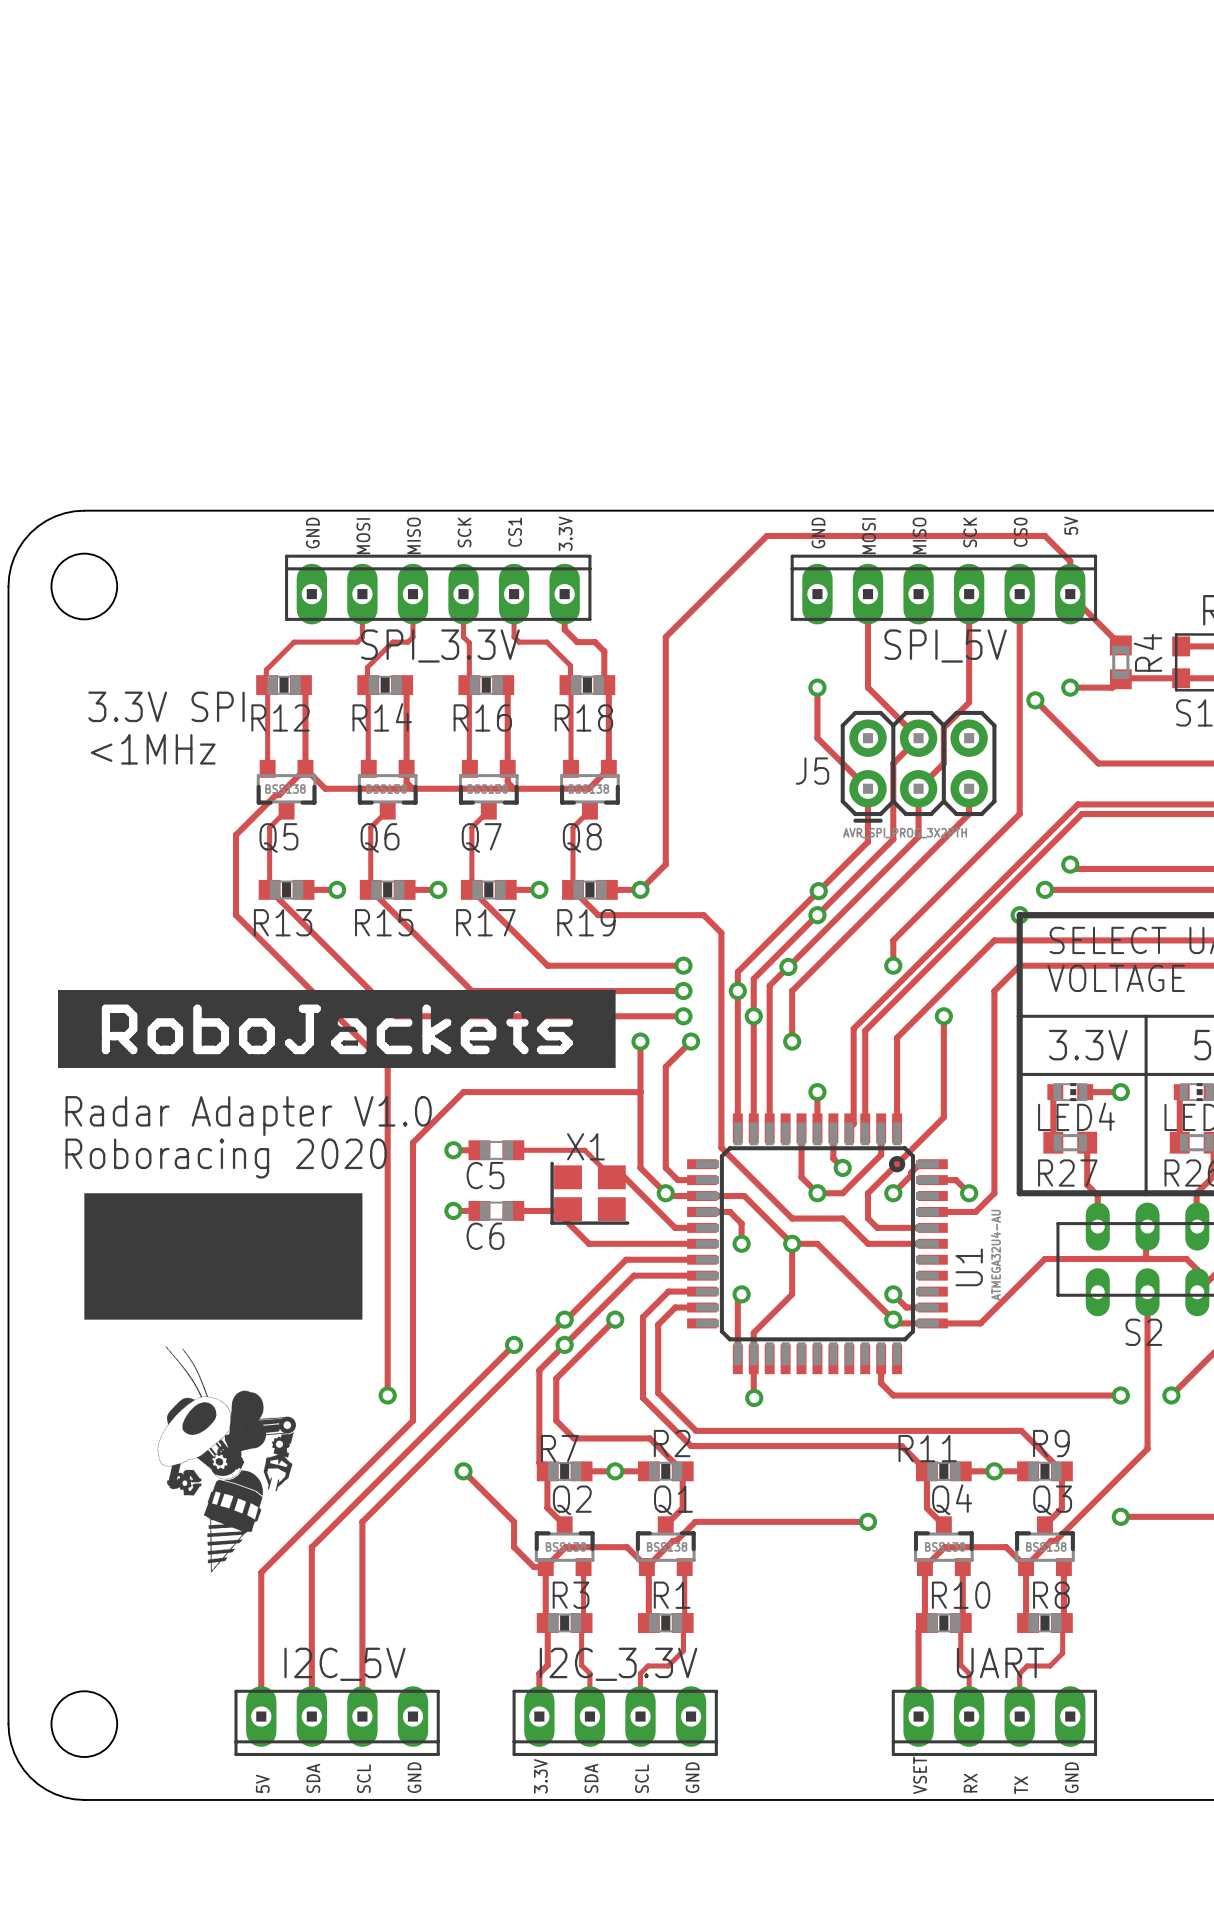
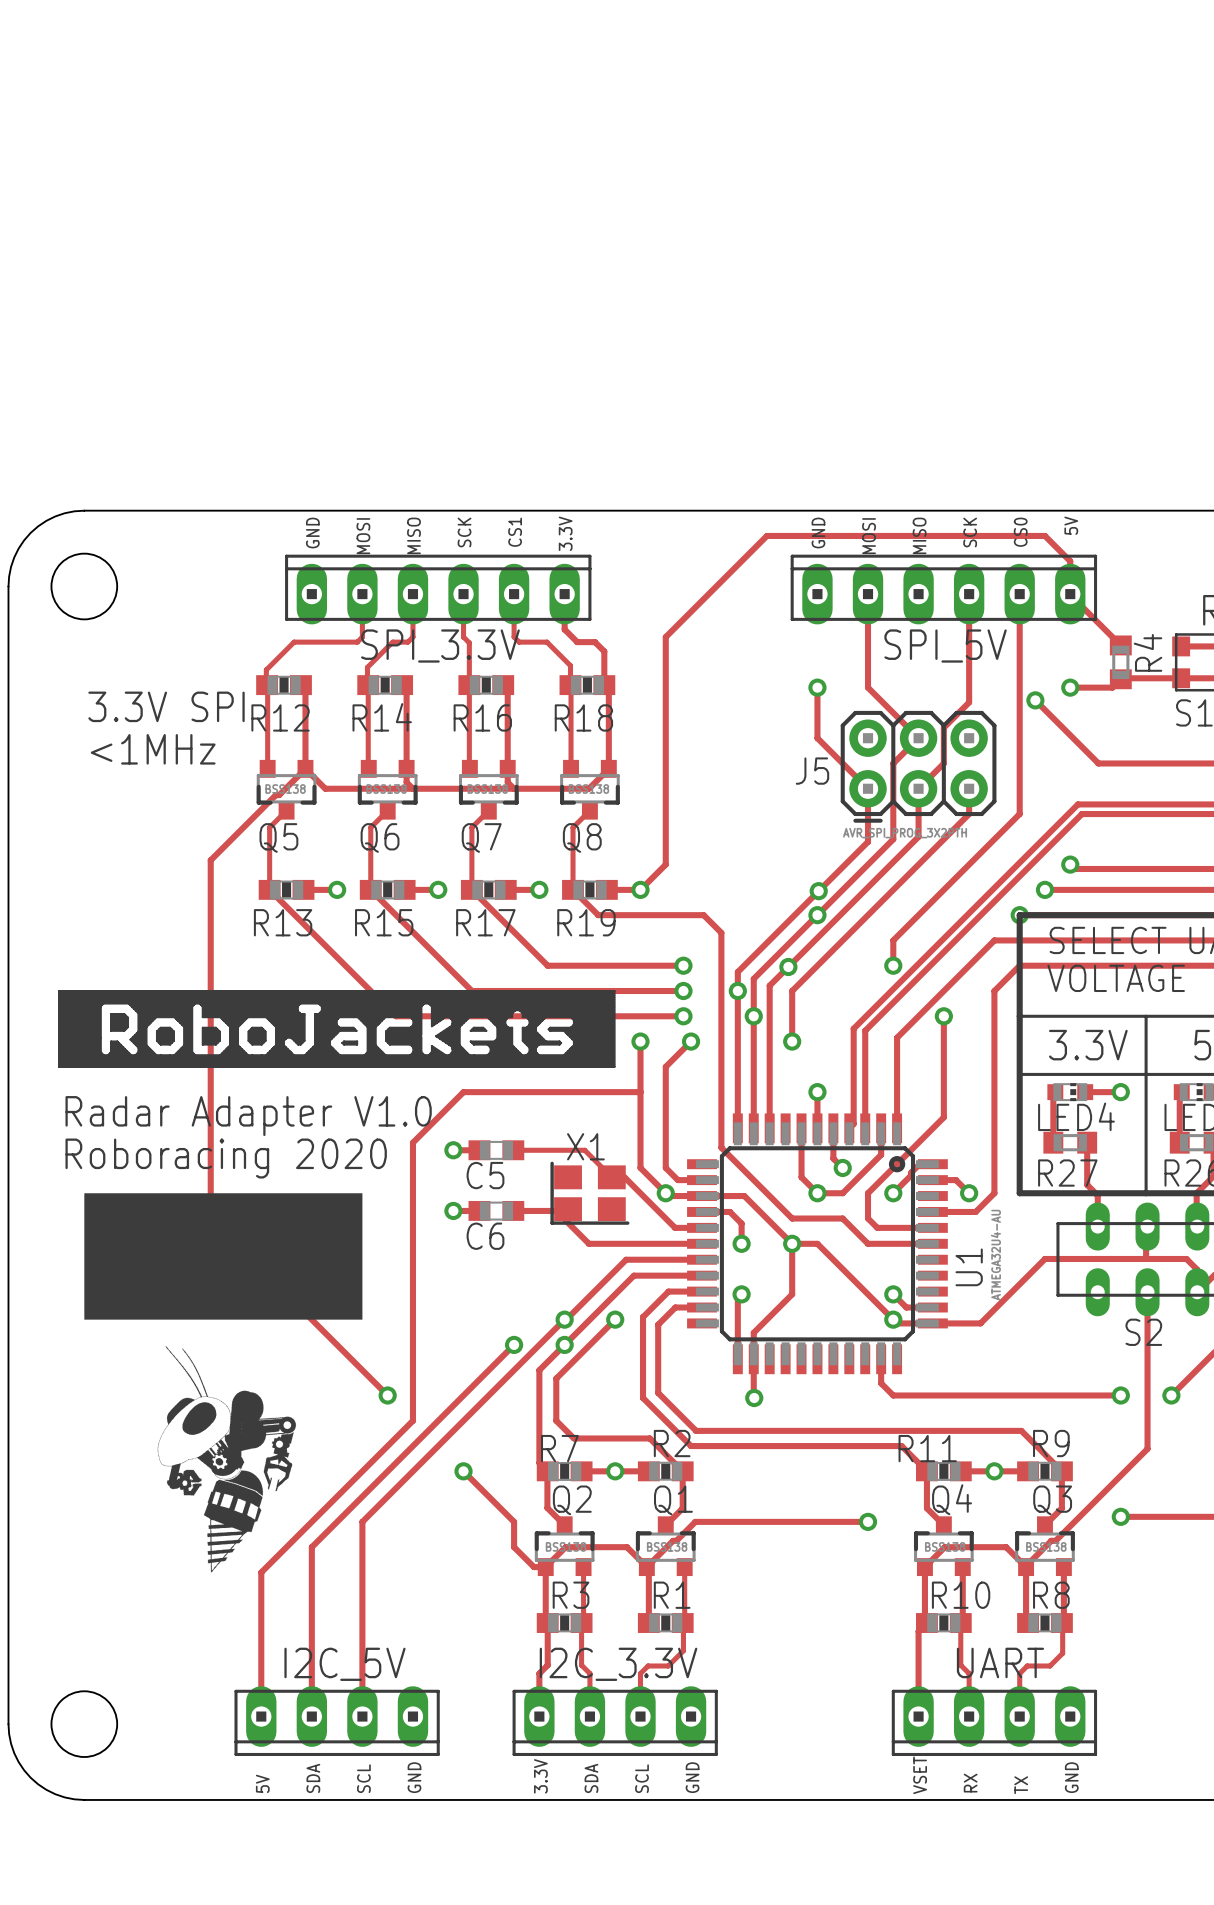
track: (236, 835) (236, 915) (387, 1066) (387, 1395) -> (236, 835) (210, 860) (210, 1218) (387, 1395)

